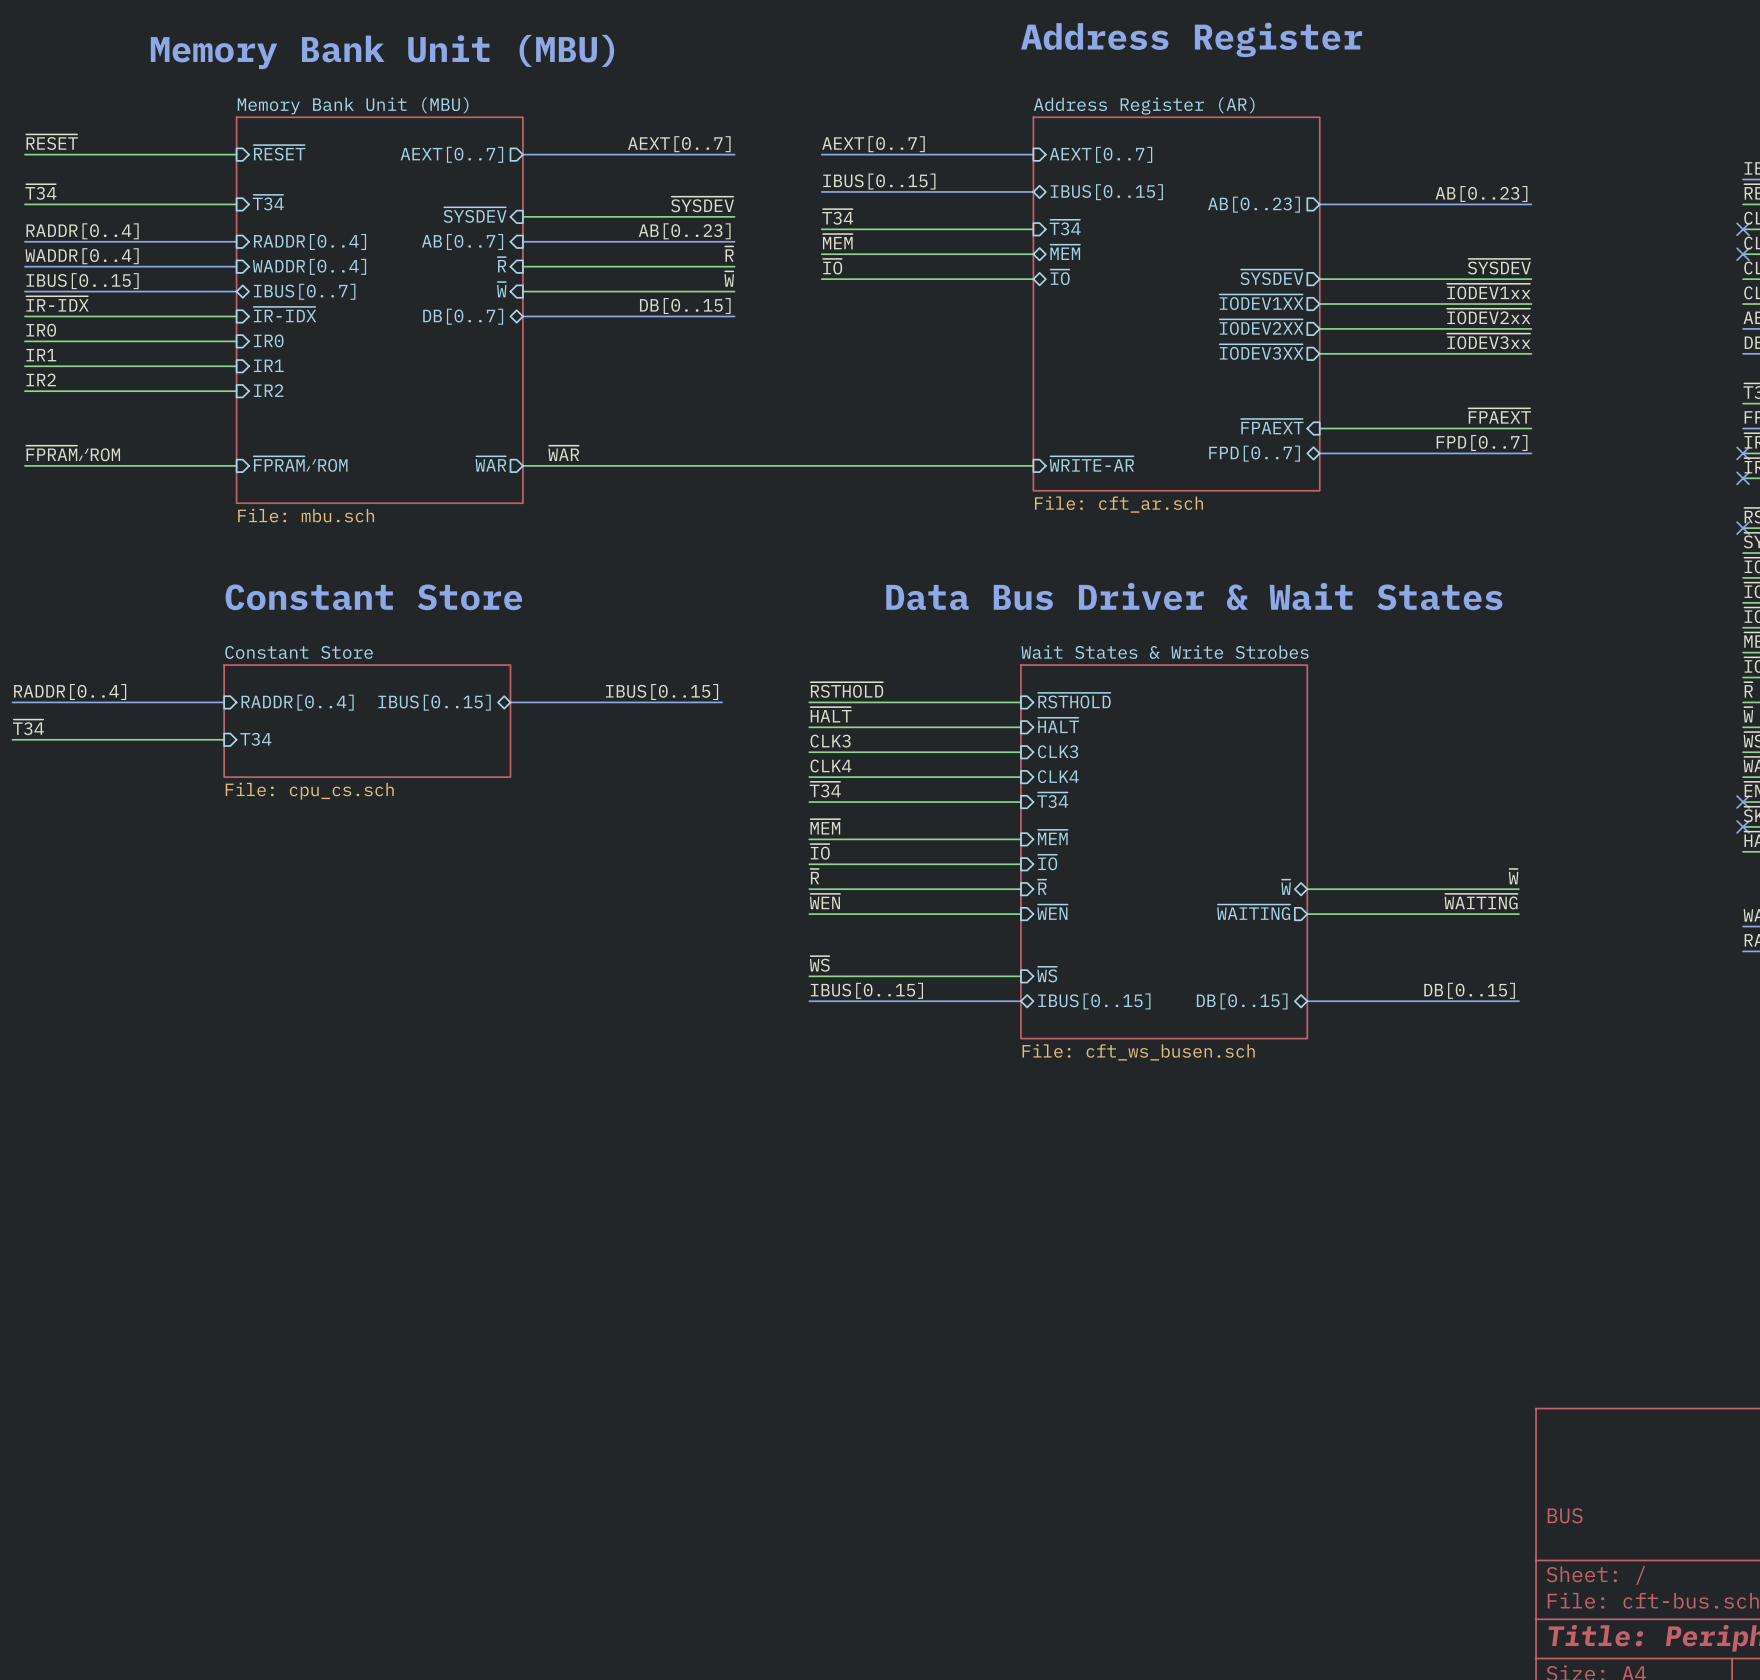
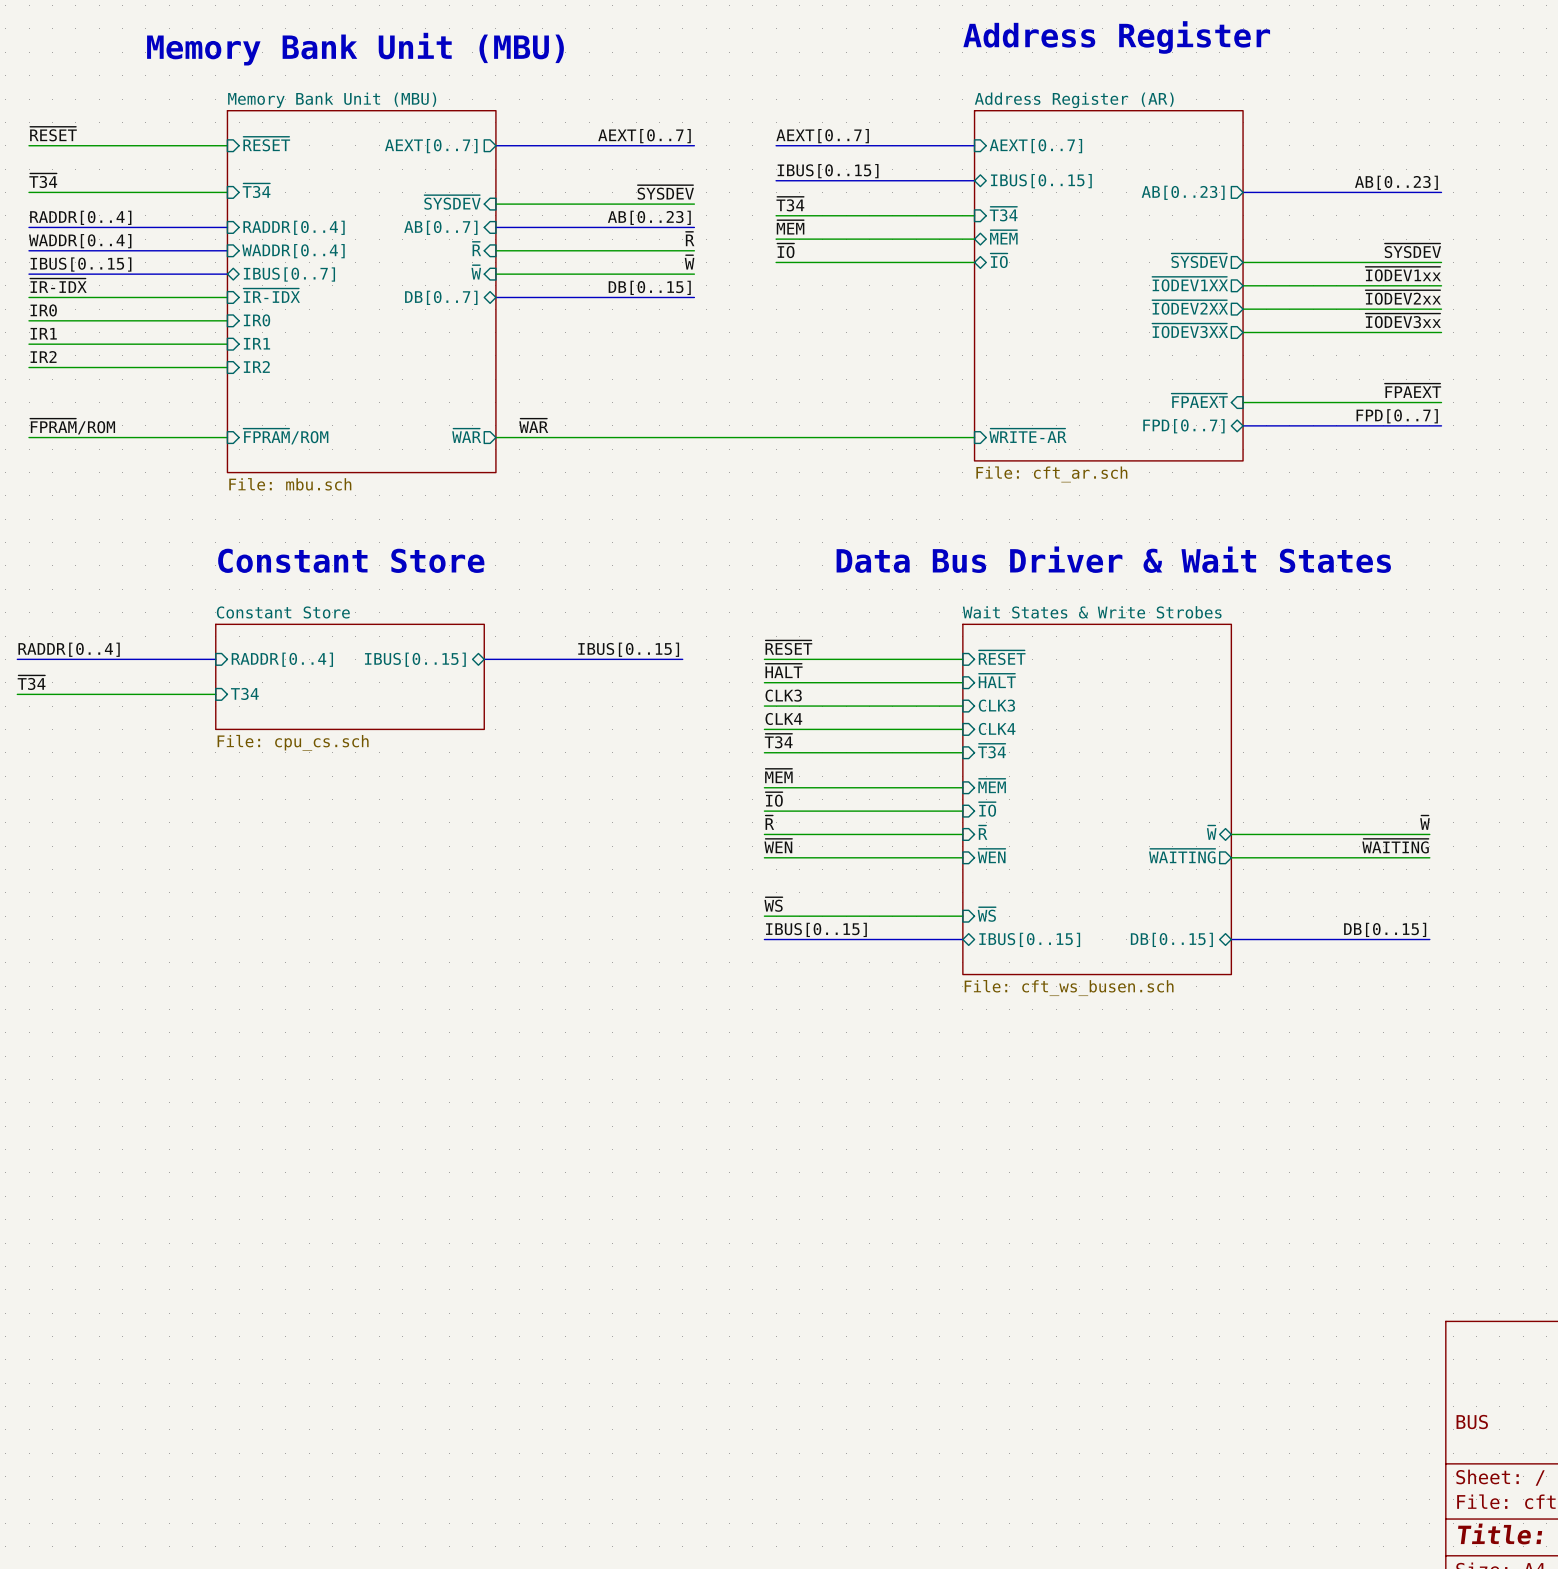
label: ~{RSTHOLD} (846, 689) -> ~{RESET} (788, 647)
sheet pin: ~{RSTHOLD} (1074, 700) -> ~{RESET} (1002, 657)

